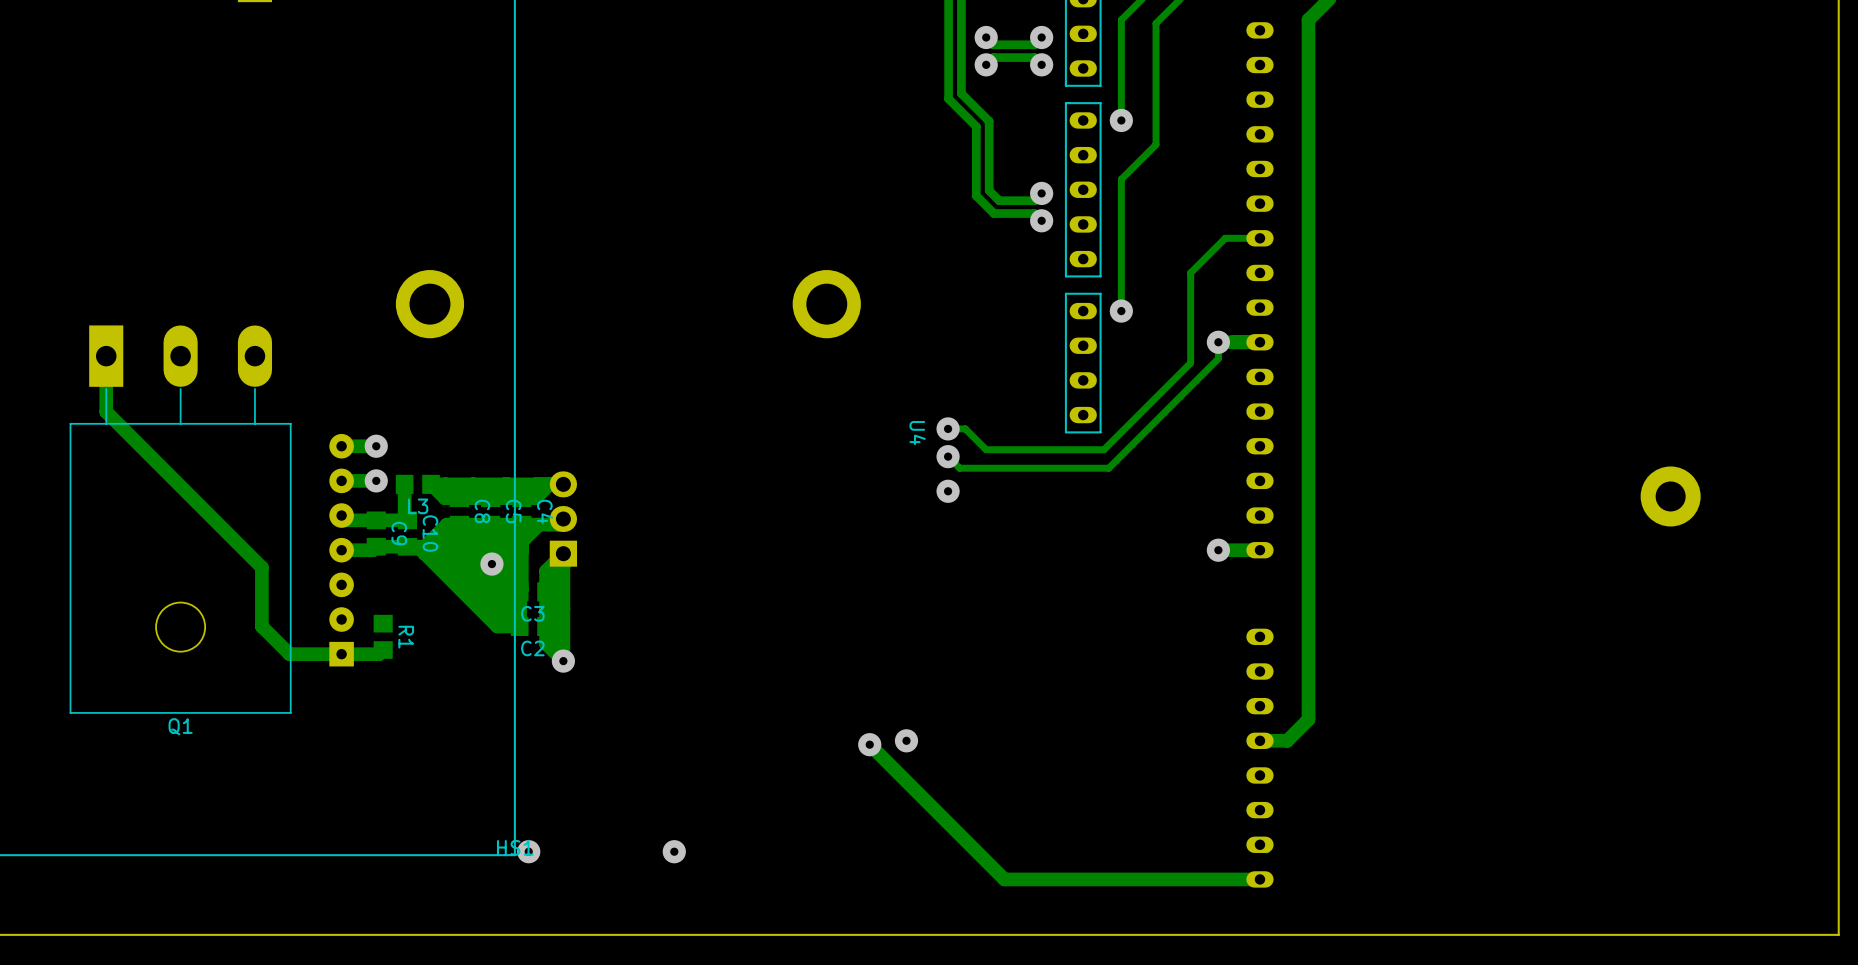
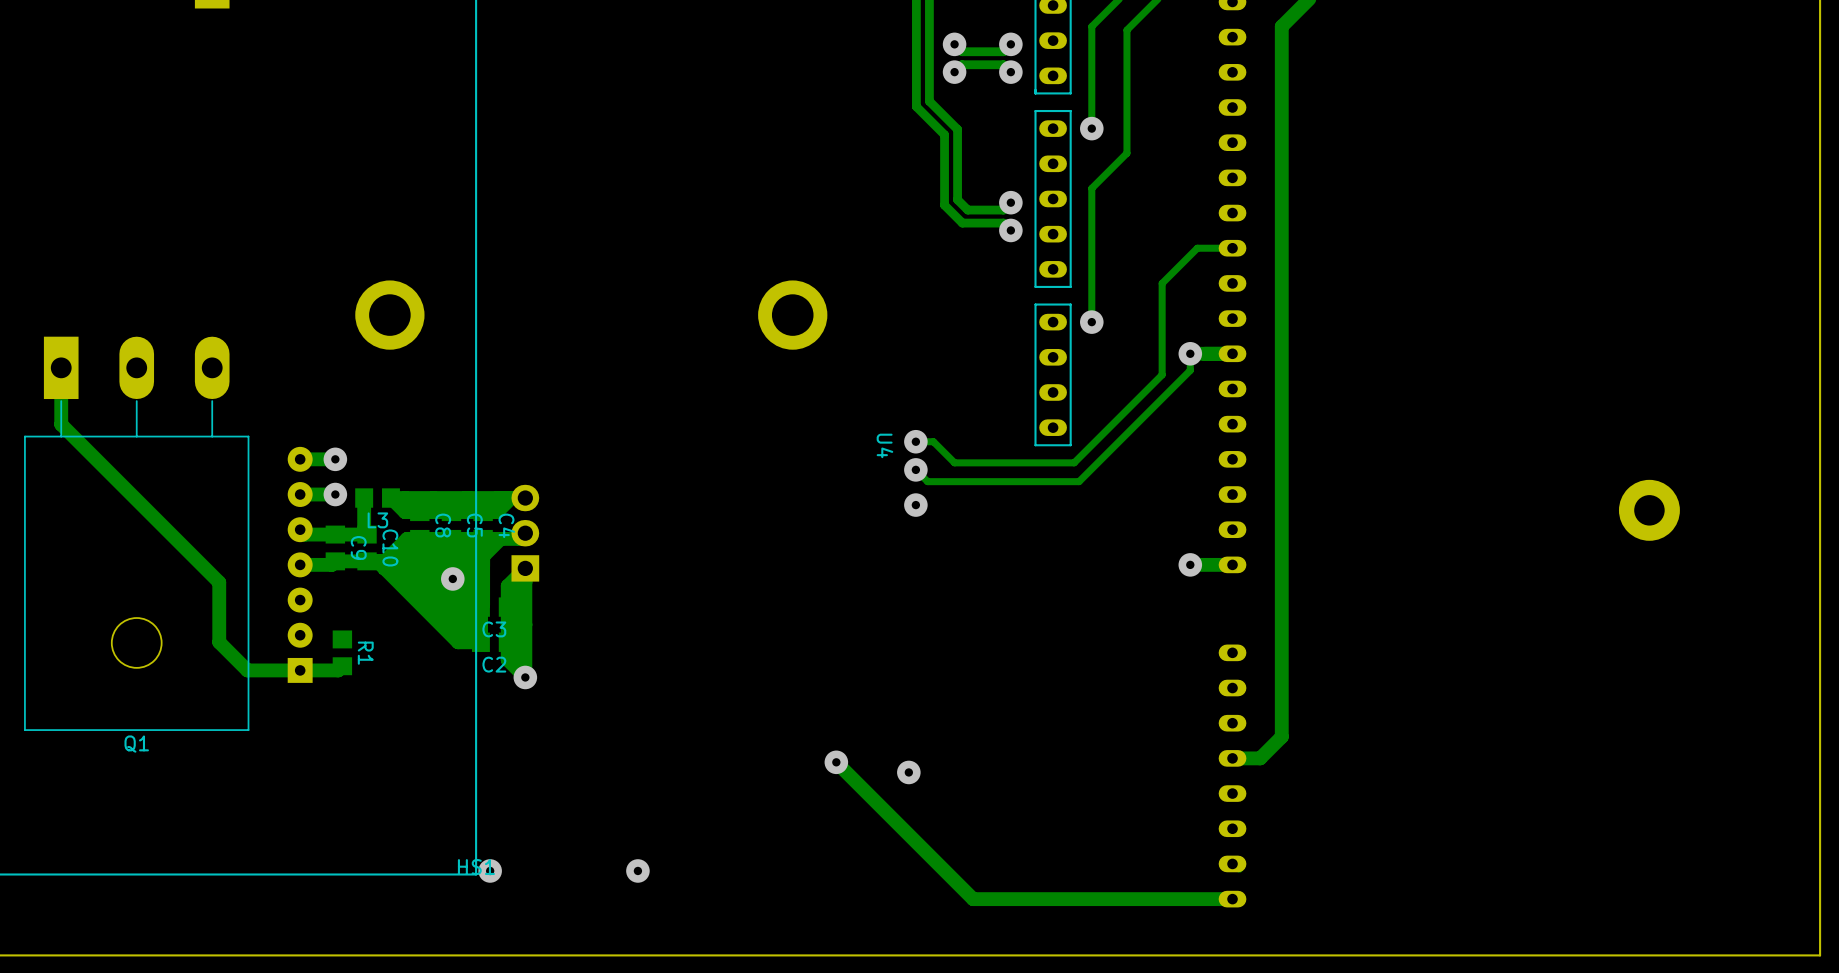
via position: (906, 740) -> (908, 772)

